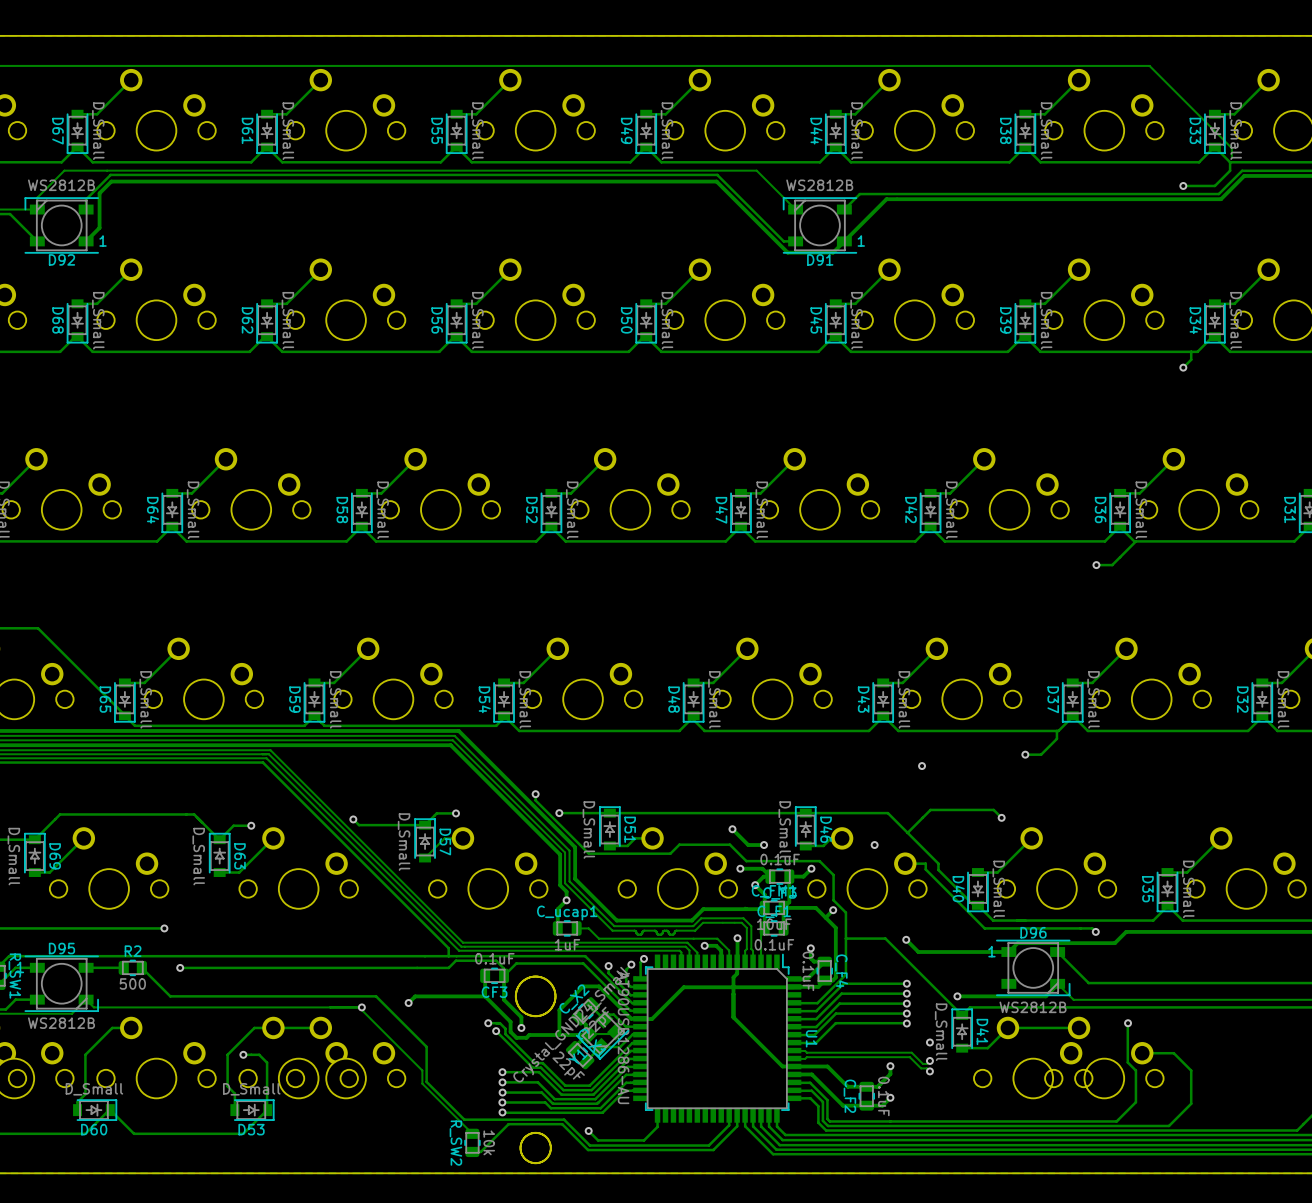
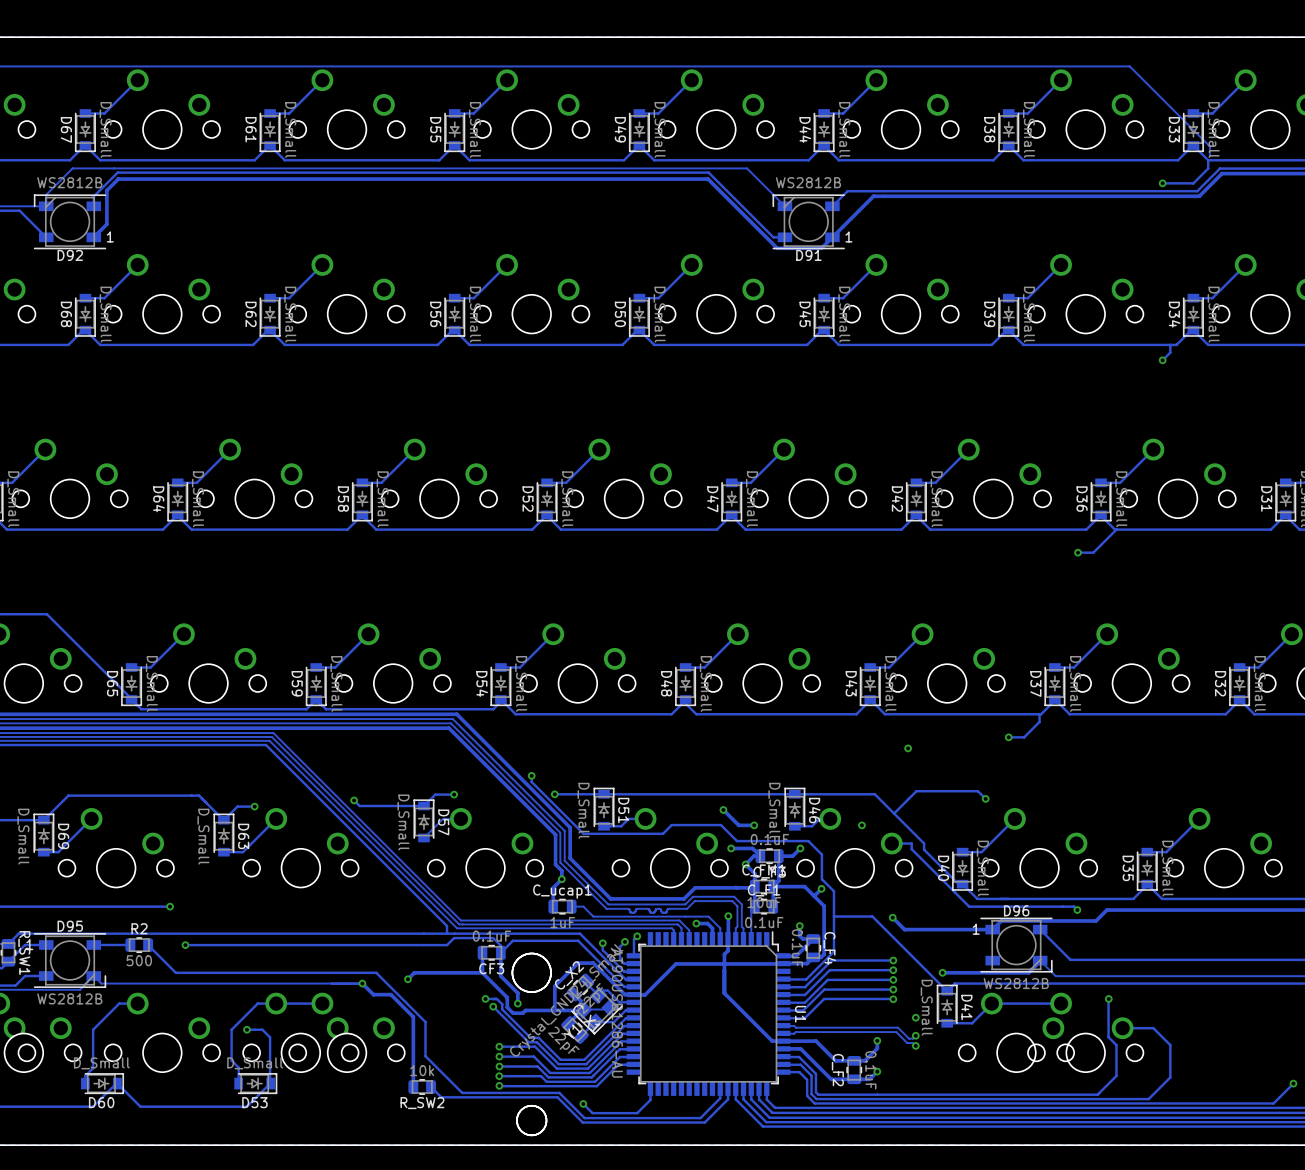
track: (359, 1007) (422, 1070) (422, 1083) (472, 1133) -> none
track: none -> (362, 983) (373, 994) (391, 994) (413, 1016) (413, 1086)
track: (508, 1124) (480, 1151) (472, 1151) -> (505, 1097) (441, 1097) (431, 1086)
R_SW2 rotation: 0° (472, 1142) -> 90° clockwise (422, 1086)
R_SW2 position: (472, 1142) -> (422, 1086)
R_SW2 value position: 10k (489, 1142) -> 10k (422, 1070)
R_SW2 name position: R_SW2 (455, 1143) -> R_SW2 (422, 1103)

